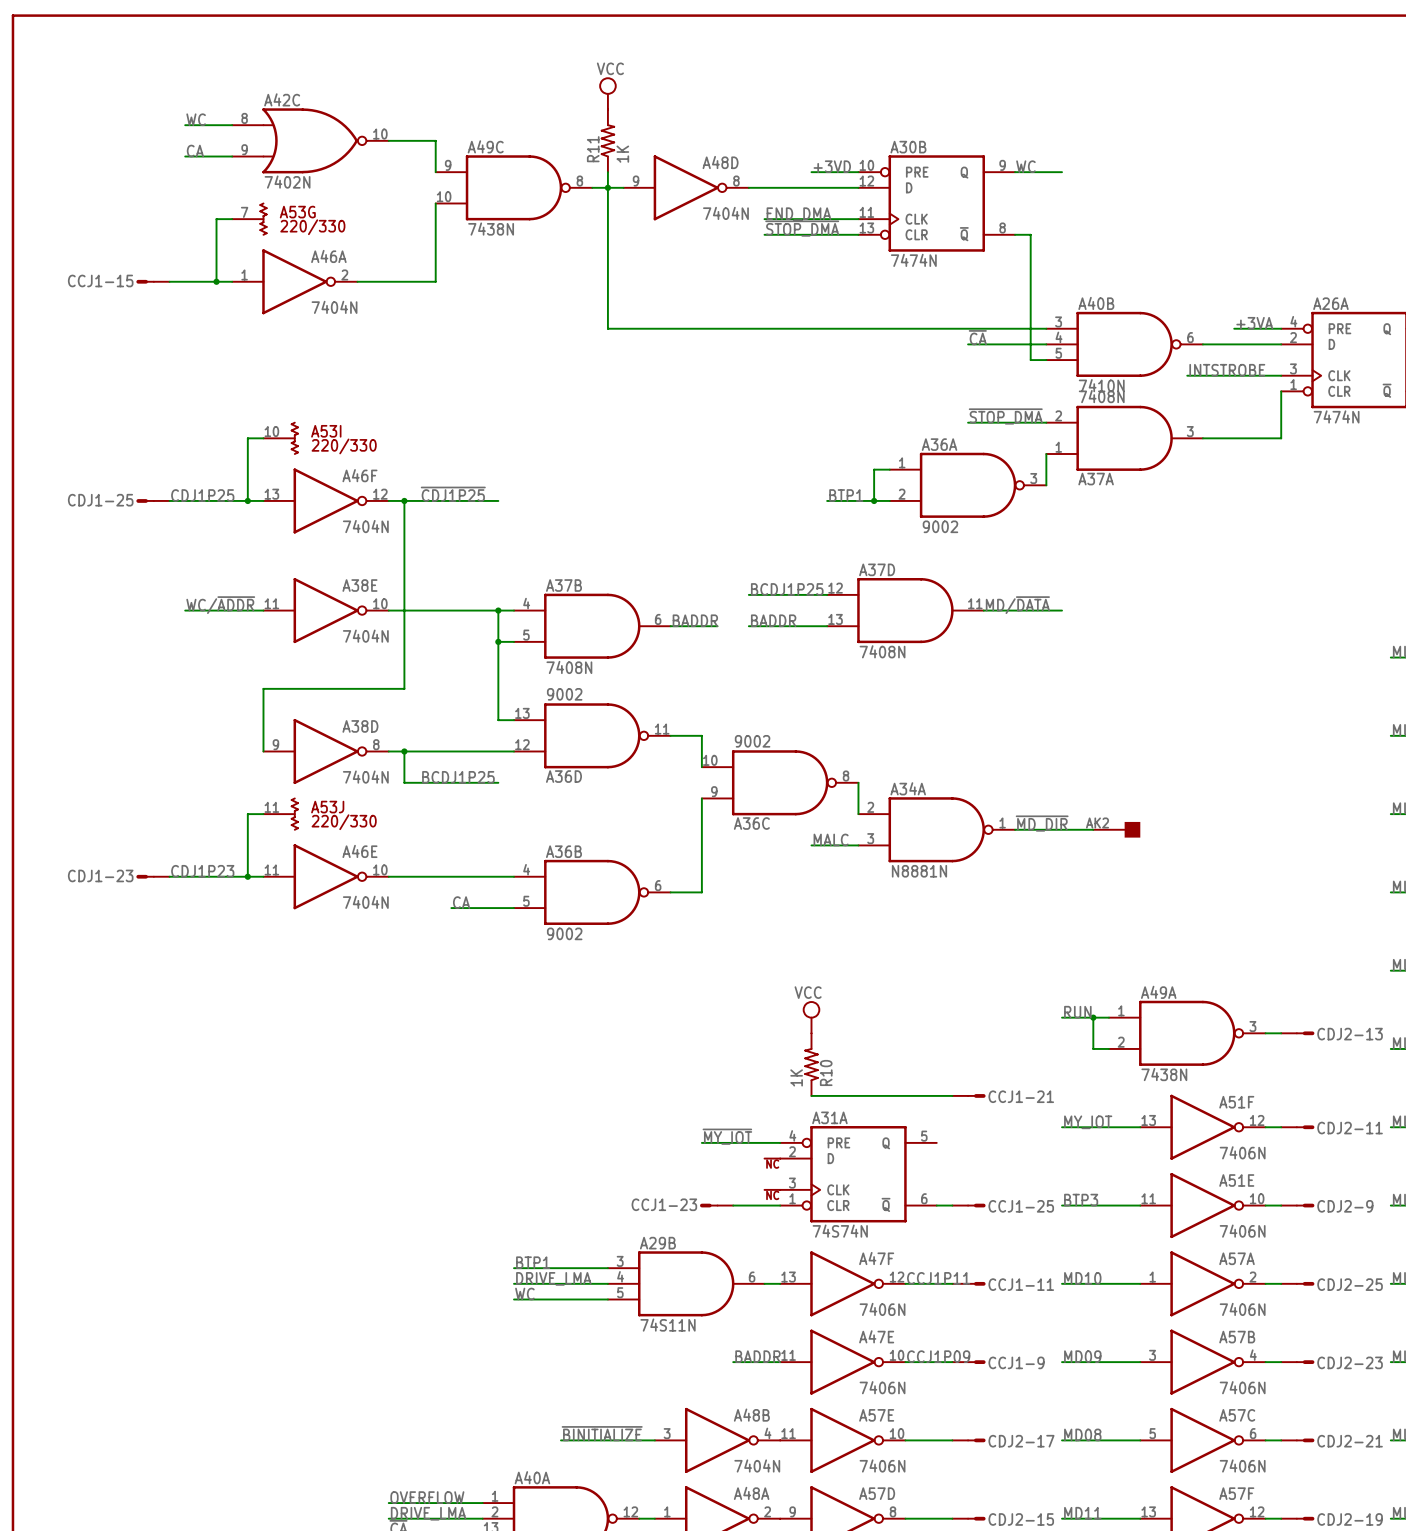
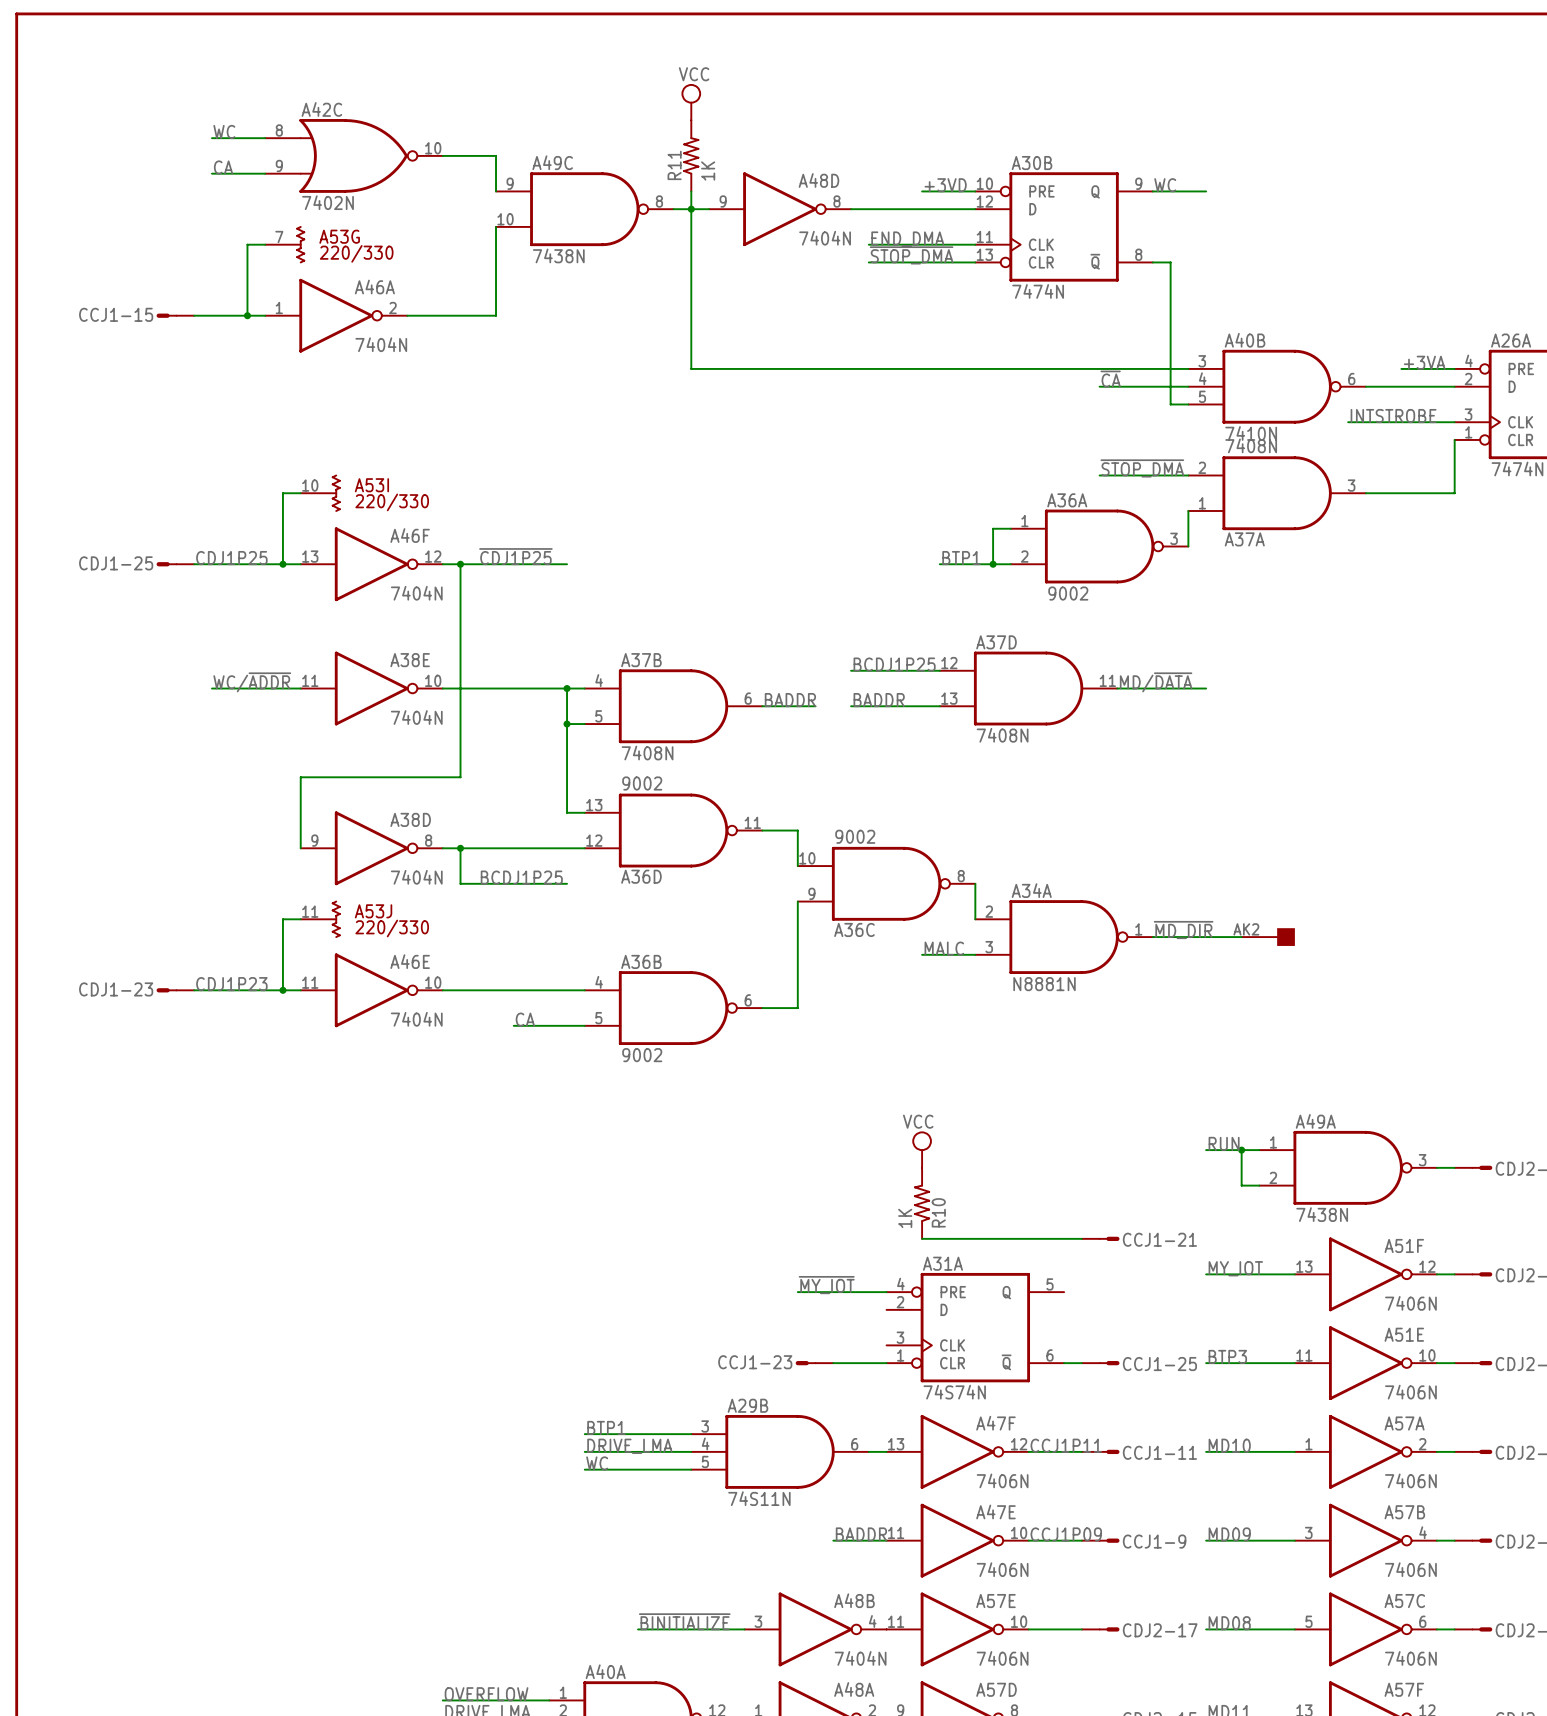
power symbol: (772, 1158) -> none
power symbol: (772, 1189) -> none

